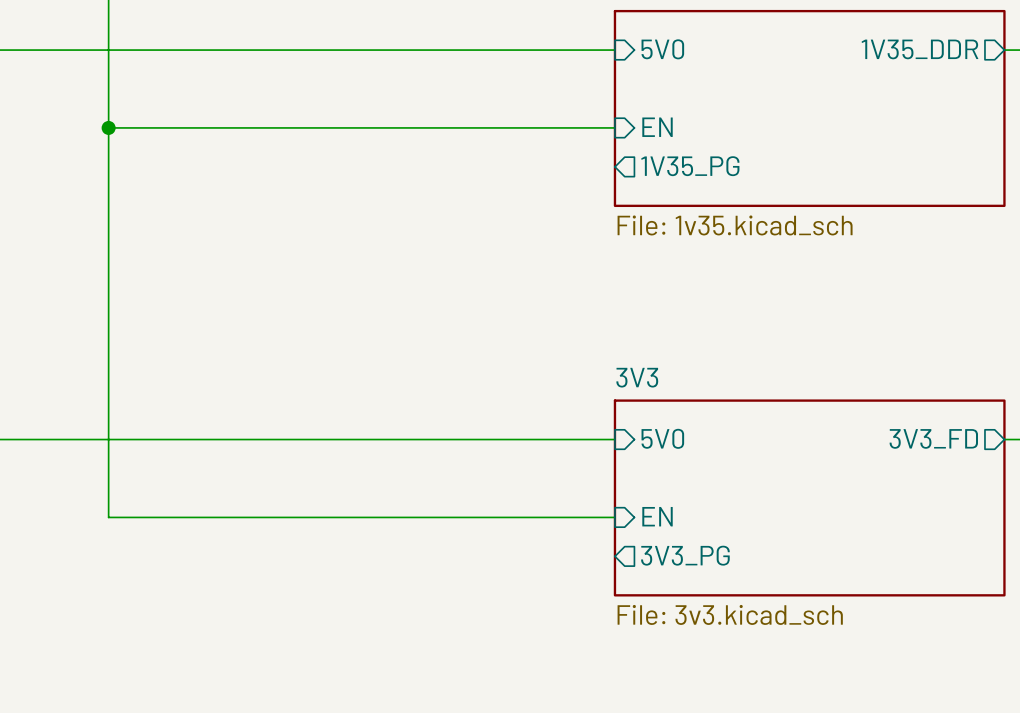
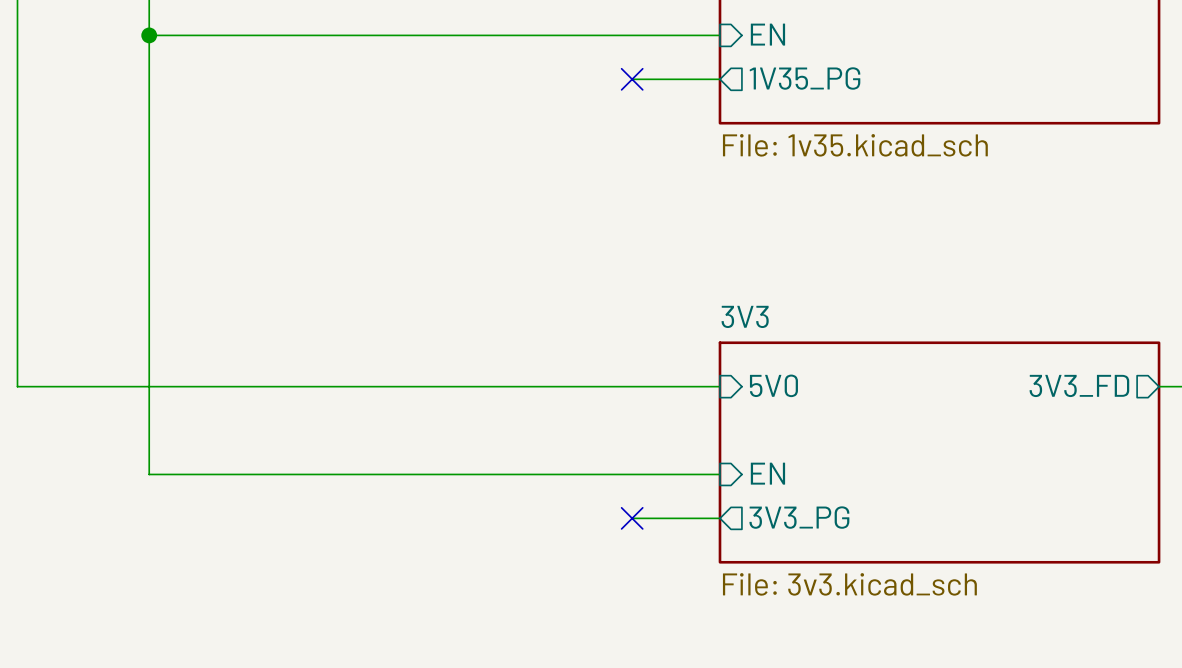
wire: none -> (632, 79) (719, 79)
no-connect mark: none -> (632, 79)
wire: none -> (632, 518) (719, 518)
no-connect mark: none -> (632, 518)

